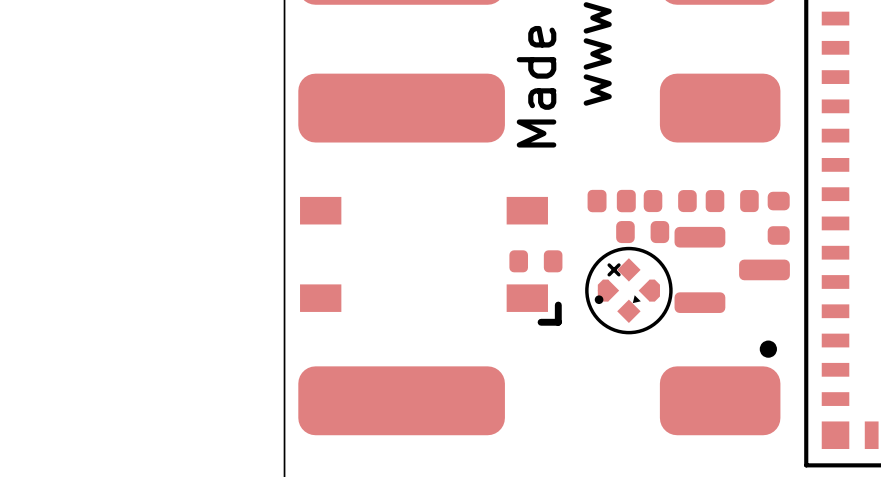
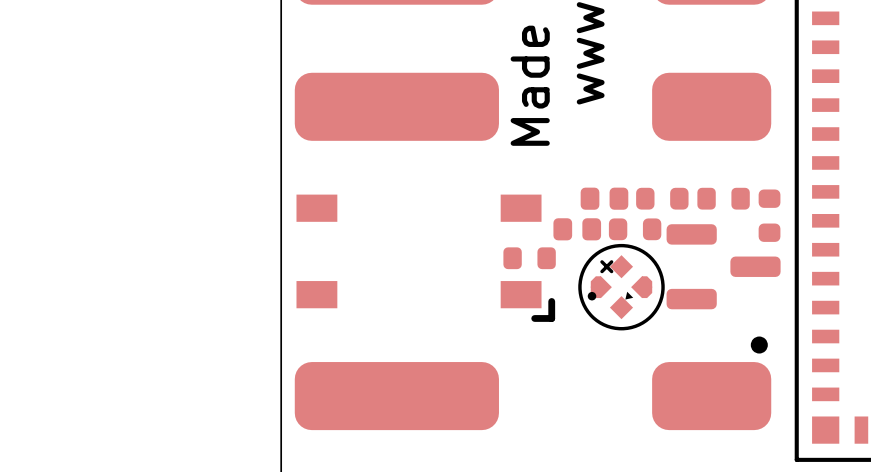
part: none -> (577, 229)

